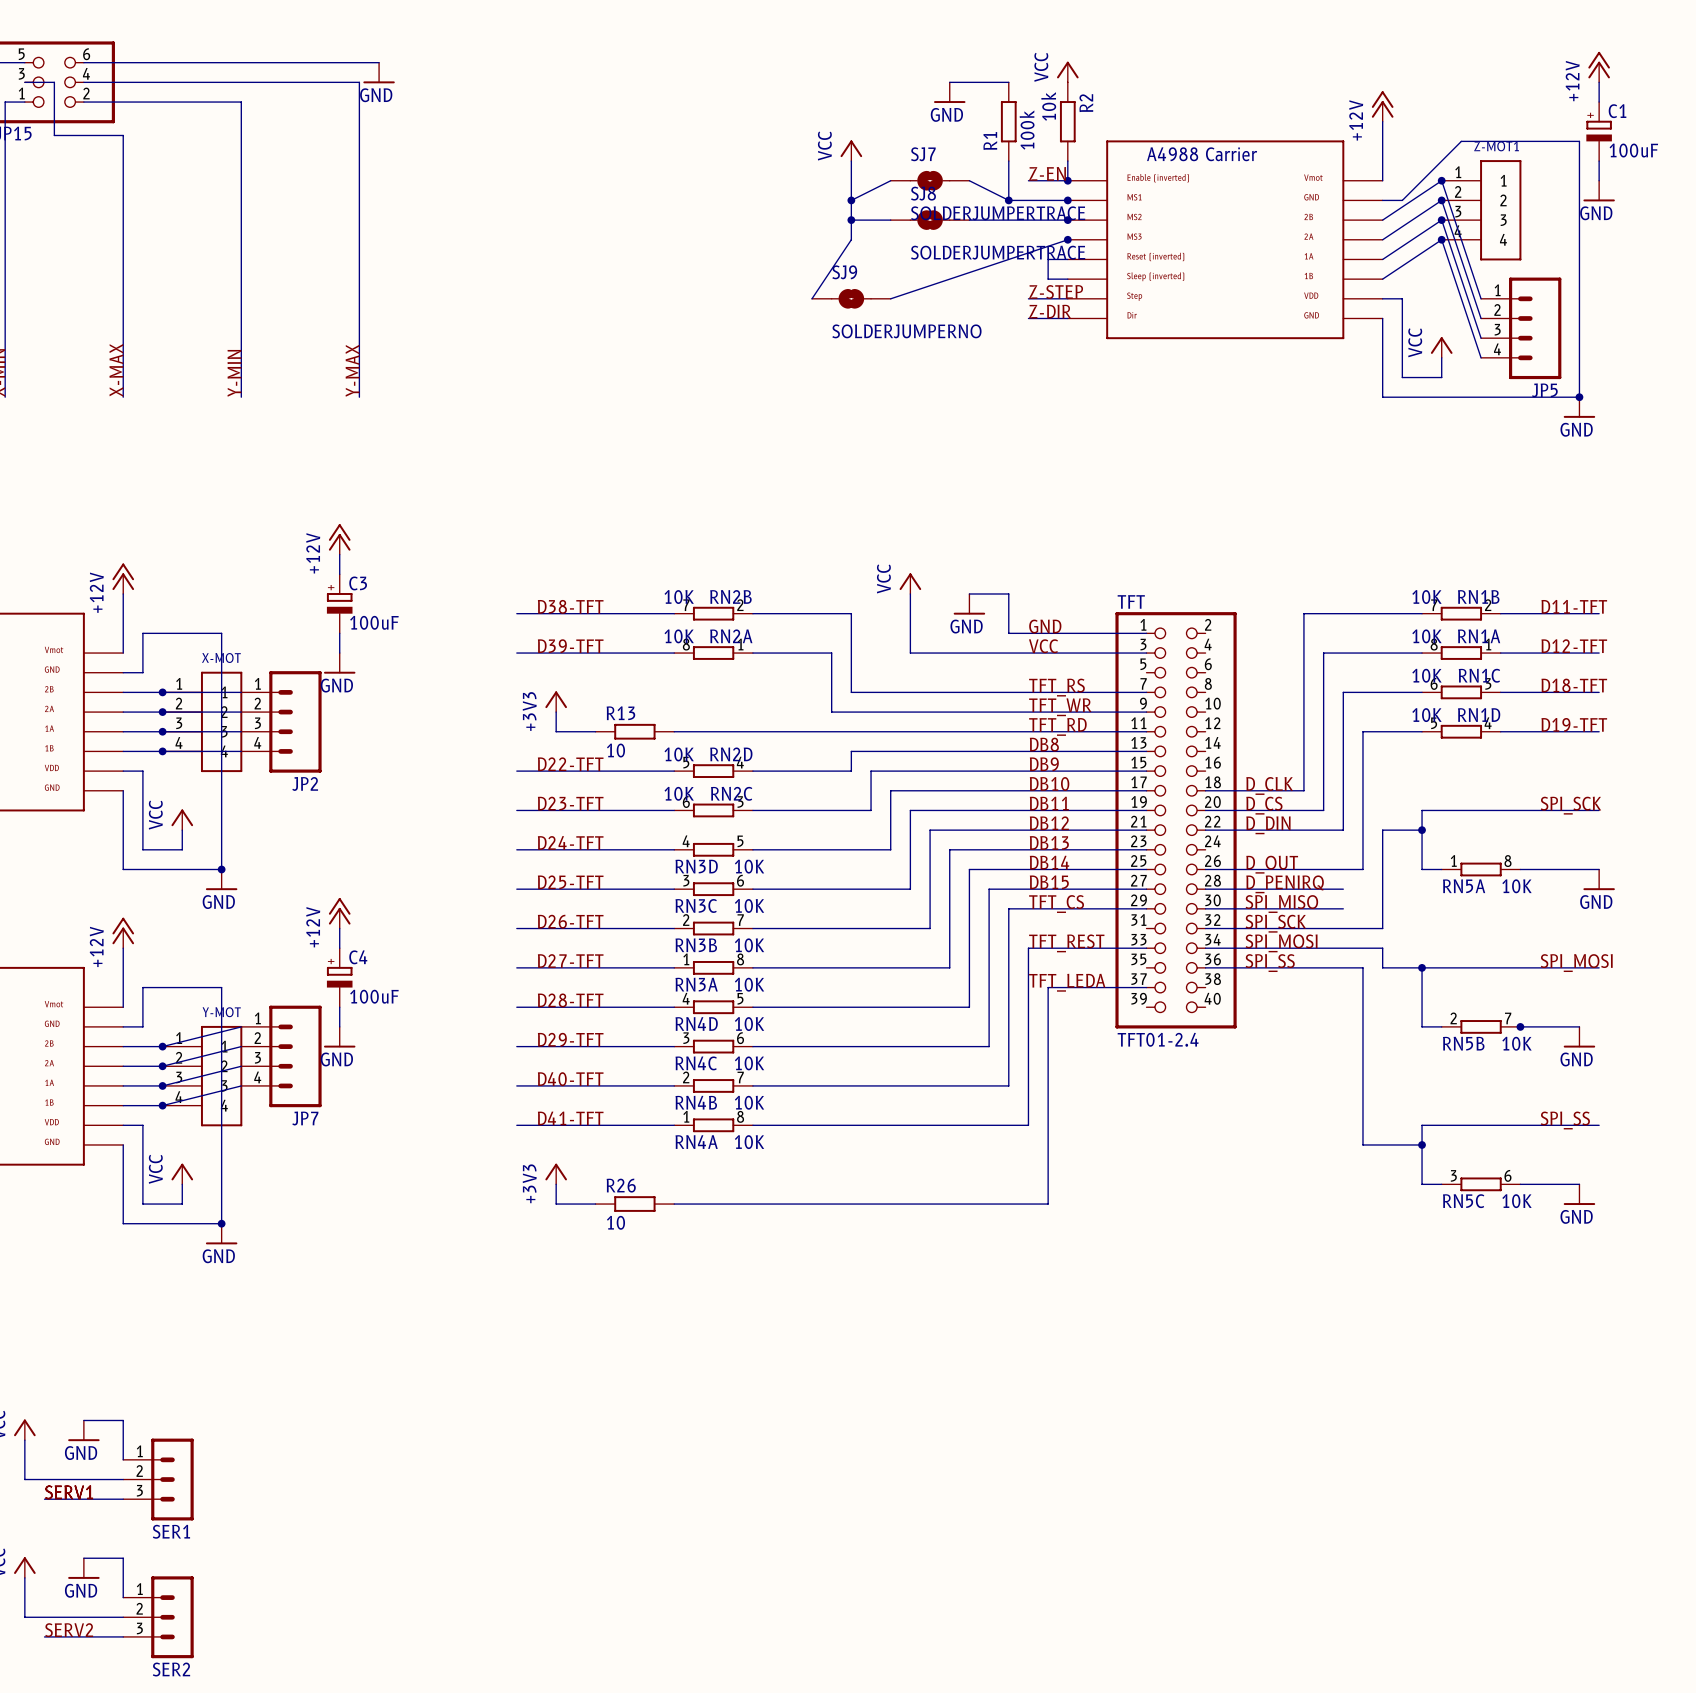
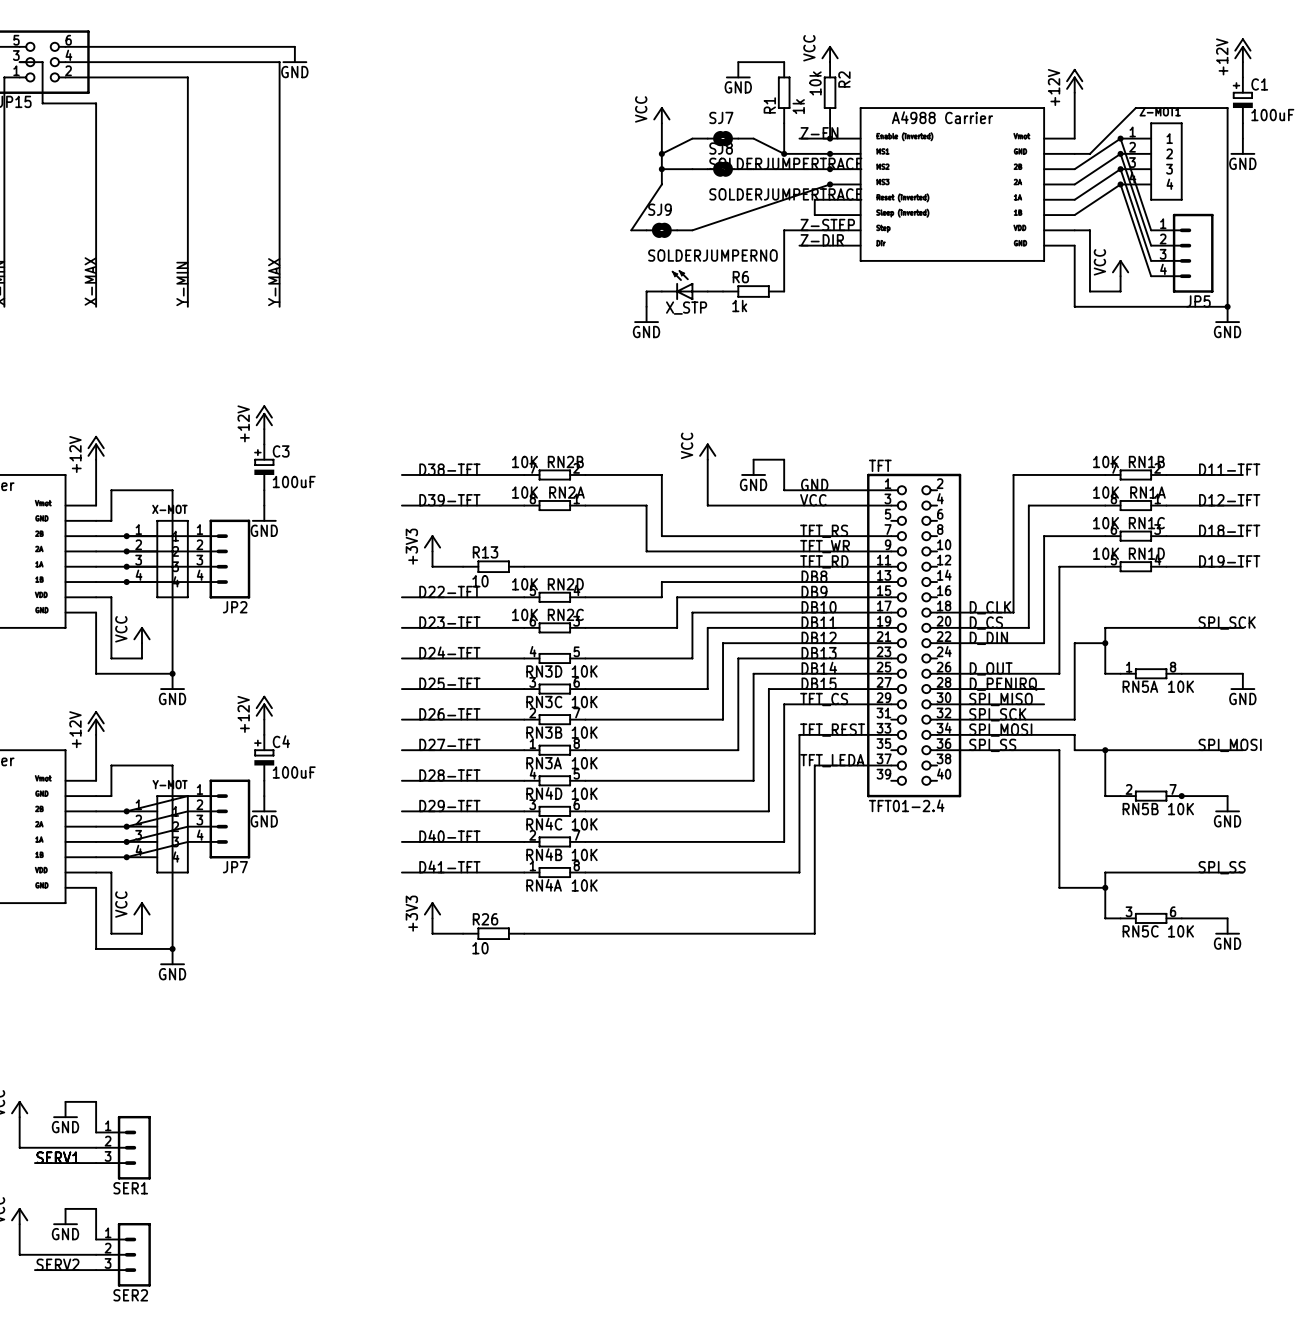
R1 value: 100k (1027, 130) -> 1k (798, 106)
wire: none -> (799, 230) (784, 230) (784, 291)
X_STP: none -> (684, 285)
wire: none -> (661, 291) (646, 291) (646, 306)
wire: none -> (707, 291) (723, 291)
R6: none -> 1k (753, 291)
power symbol: none -> GND (646, 314)

